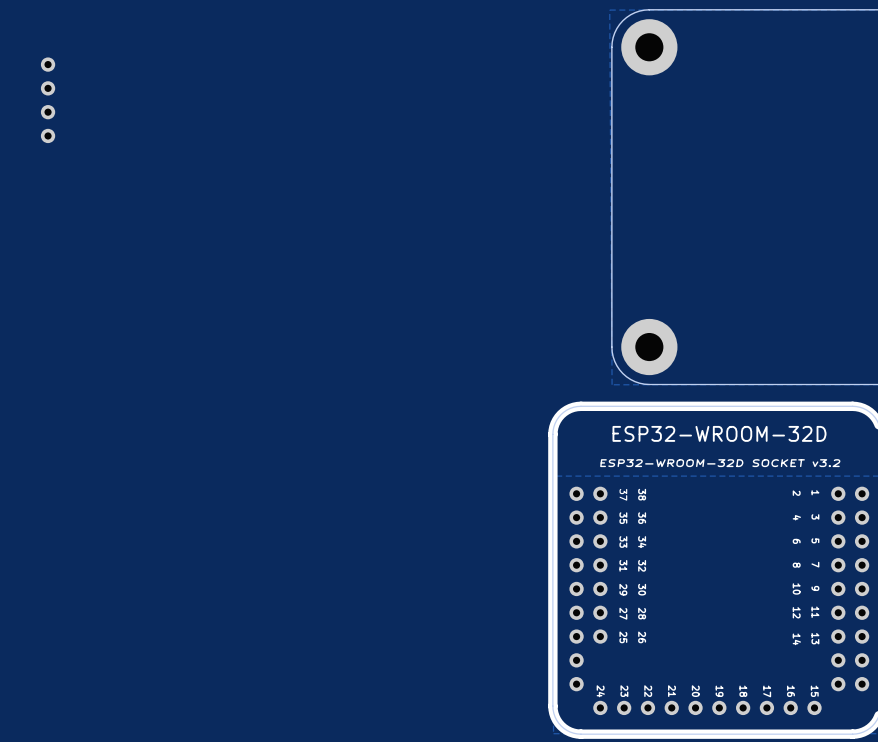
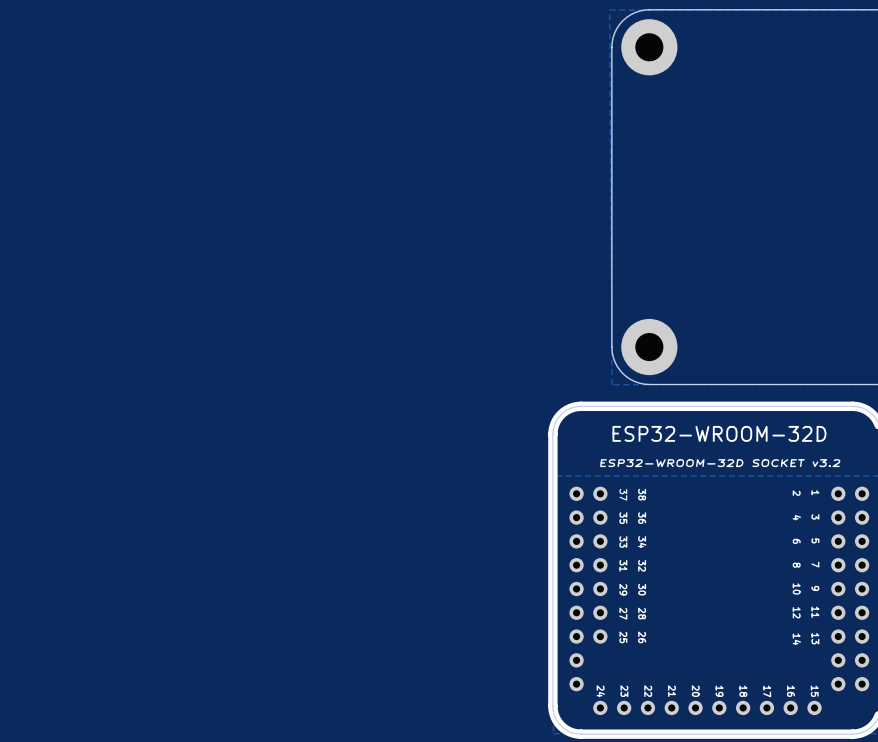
part: (48, 100) -> none

